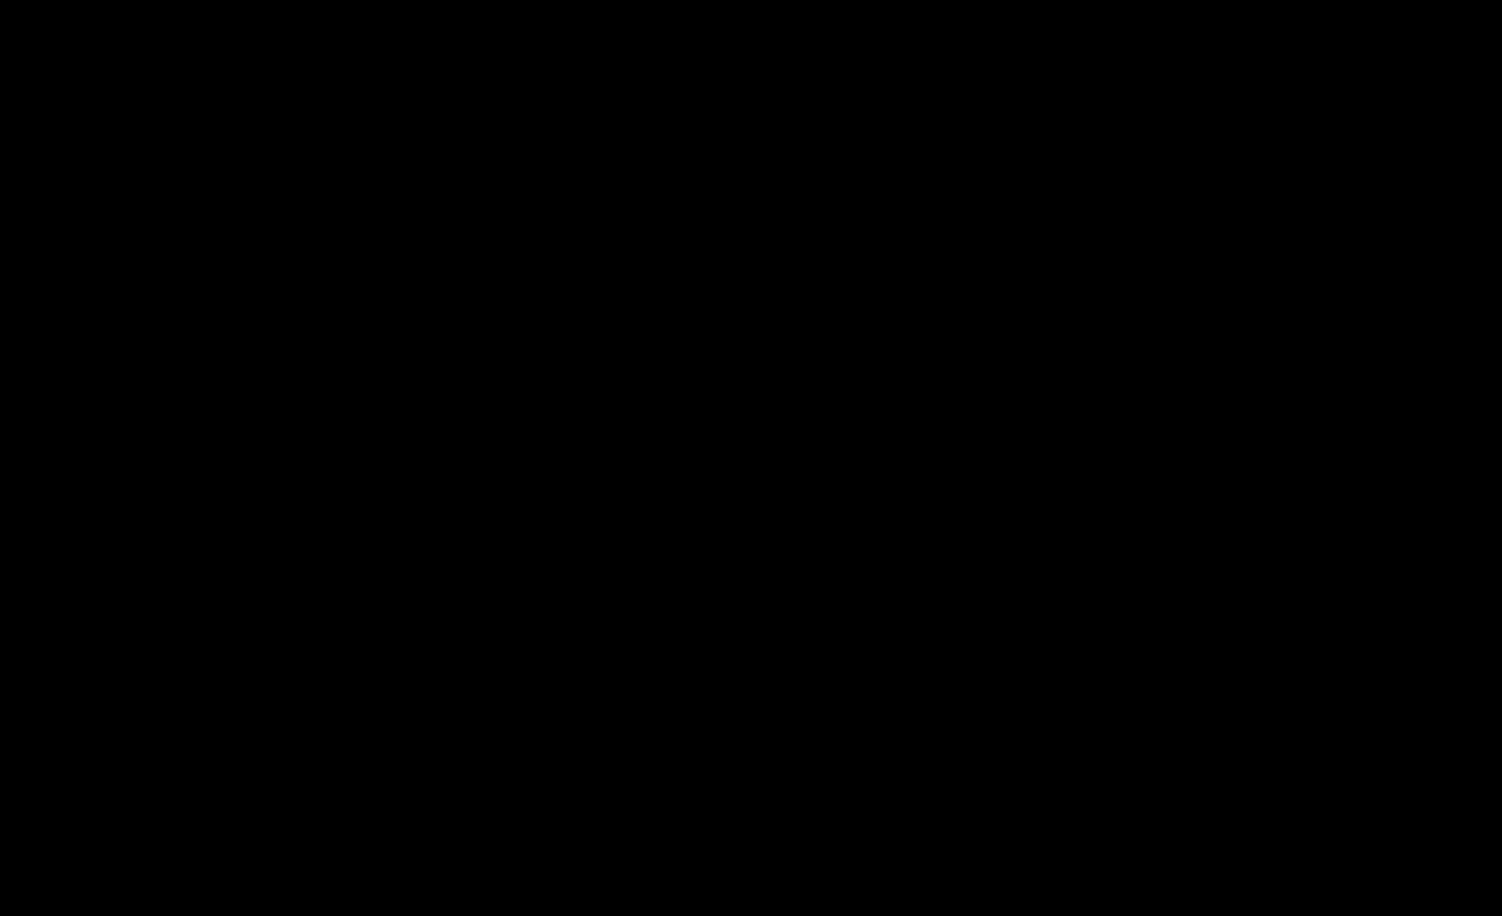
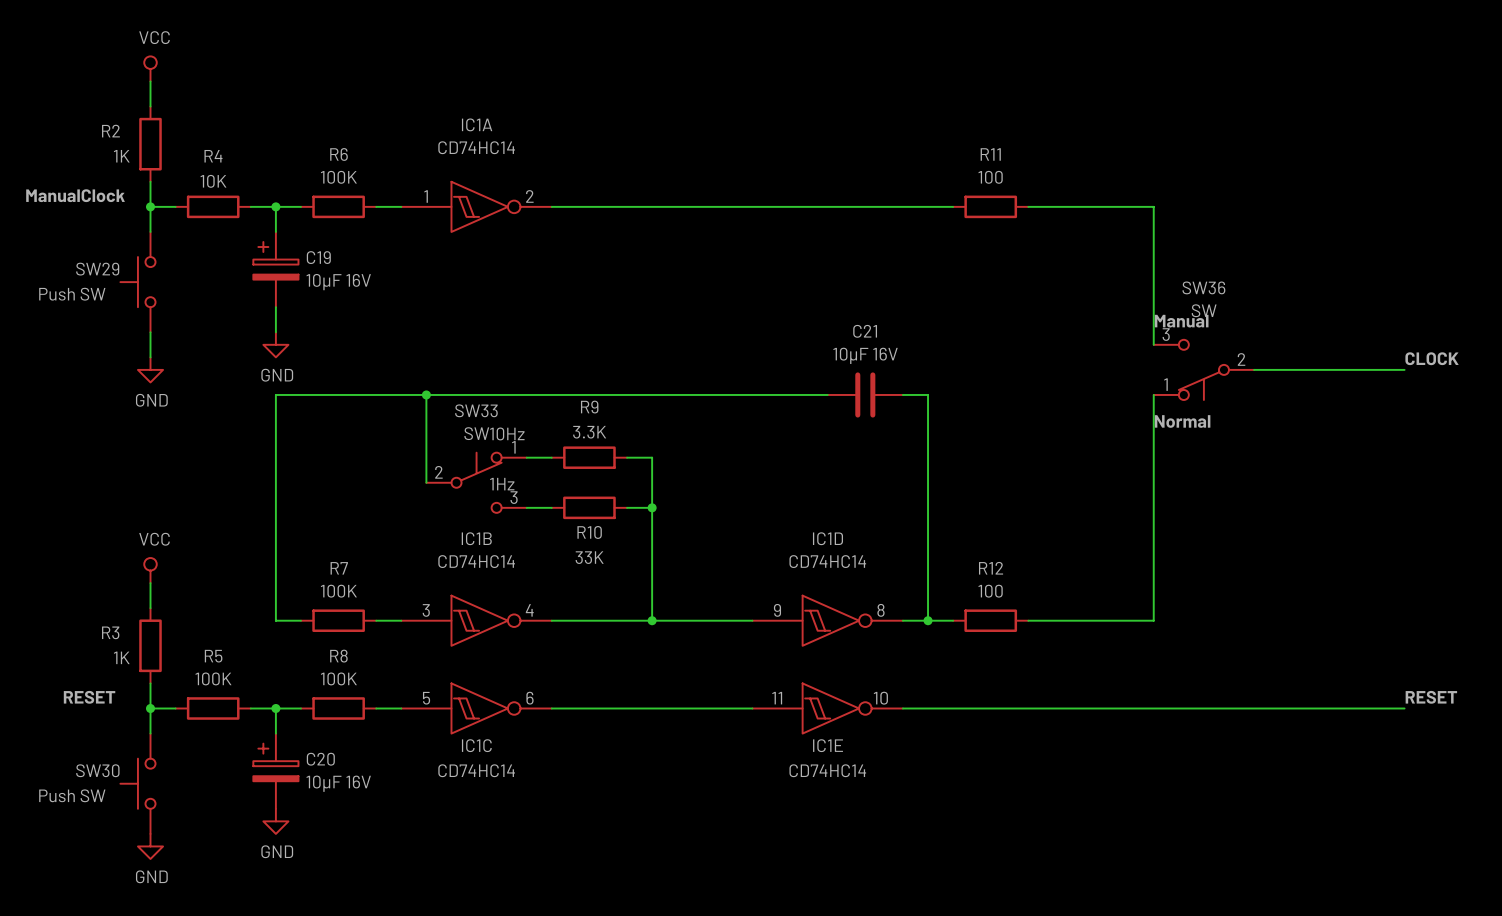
power symbol: none -> VCC (150, 68)
wire: none -> (150, 81) (150, 106)
R2: none -> 1K (150, 144)
wire: none -> (150, 181) (150, 231)
label: none -> ManualClock (75, 195)
wire: none -> (150, 206) (175, 206)
junction: none -> (150, 206)
R4: none -> 10K (213, 206)
wire: none -> (250, 206) (300, 206)
wire: none -> (275, 206) (275, 231)
junction: none -> (275, 206)
R6: none -> 100K (338, 206)
wire: none -> (376, 206) (401, 206)
IC1A: none -> CD74HC14 (476, 206)
wire: none -> (551, 206) (953, 206)
R11: none -> 100 (990, 206)
wire: none -> (1028, 206) (1153, 206) (1153, 344)
C19: none -> 10μF 16V (275, 269)
SW29: none -> Push SW (137, 282)
wire: none -> (275, 307) (275, 332)
label: none -> Manual (1181, 321)
wire: none -> (150, 332) (150, 357)
power symbol: none -> GND (275, 344)
label: none -> CLOCK (1432, 358)
power symbol: none -> GND (150, 369)
SW36: none -> SW (1203, 369)
wire: none -> (1254, 369) (1404, 369)
wire: none -> (426, 394) (426, 482)
junction: none -> (426, 394)
wire: none -> (827, 394) (275, 394) (275, 620) (300, 620)
C21: none -> 10μF 16V (865, 394)
wire: none -> (902, 394) (928, 394) (928, 620)
wire: none -> (1153, 394) (1153, 620) (1028, 620)
label: none -> Normal (1182, 421)
label: none -> 10Hz (507, 433)
wire: none -> (526, 457) (551, 457)
R9: none -> 3.3K (589, 457)
wire: none -> (627, 457) (652, 457) (652, 620)
SW33: none -> SW (476, 482)
label: none -> 1Hz (502, 484)
wire: none -> (526, 507) (551, 507)
R10: none -> 33K (589, 507)
wire: none -> (627, 507) (652, 507)
junction: none -> (652, 507)
power symbol: none -> VCC (150, 570)
wire: none -> (150, 583) (150, 608)
R7: none -> 100K (338, 620)
wire: none -> (376, 620) (401, 620)
IC1B: none -> CD74HC14 (476, 620)
wire: none -> (551, 620) (752, 620)
junction: none -> (652, 620)
IC1D: none -> CD74HC14 (827, 620)
wire: none -> (902, 620) (953, 620)
junction: none -> (928, 620)
R12: none -> 100 (990, 620)
R3: none -> 1K (150, 645)
wire: none -> (150, 683) (150, 733)
label: none -> RESET (89, 697)
label: none -> RESET (1431, 697)
wire: none -> (150, 708) (175, 708)
junction: none -> (150, 708)
R5: none -> 100K (213, 708)
wire: none -> (250, 708) (300, 708)
wire: none -> (275, 708) (275, 733)
junction: none -> (275, 708)
R8: none -> 100K (338, 708)
wire: none -> (376, 708) (401, 708)
IC1C: none -> CD74HC14 (476, 708)
wire: none -> (551, 708) (752, 708)
IC1E: none -> CD74HC14 (827, 708)
wire: none -> (902, 708) (1404, 708)
C20: none -> 10μF 16V (275, 771)
SW30: none -> Push SW (137, 783)
power symbol: none -> GND (275, 821)
power symbol: none -> GND (150, 846)

